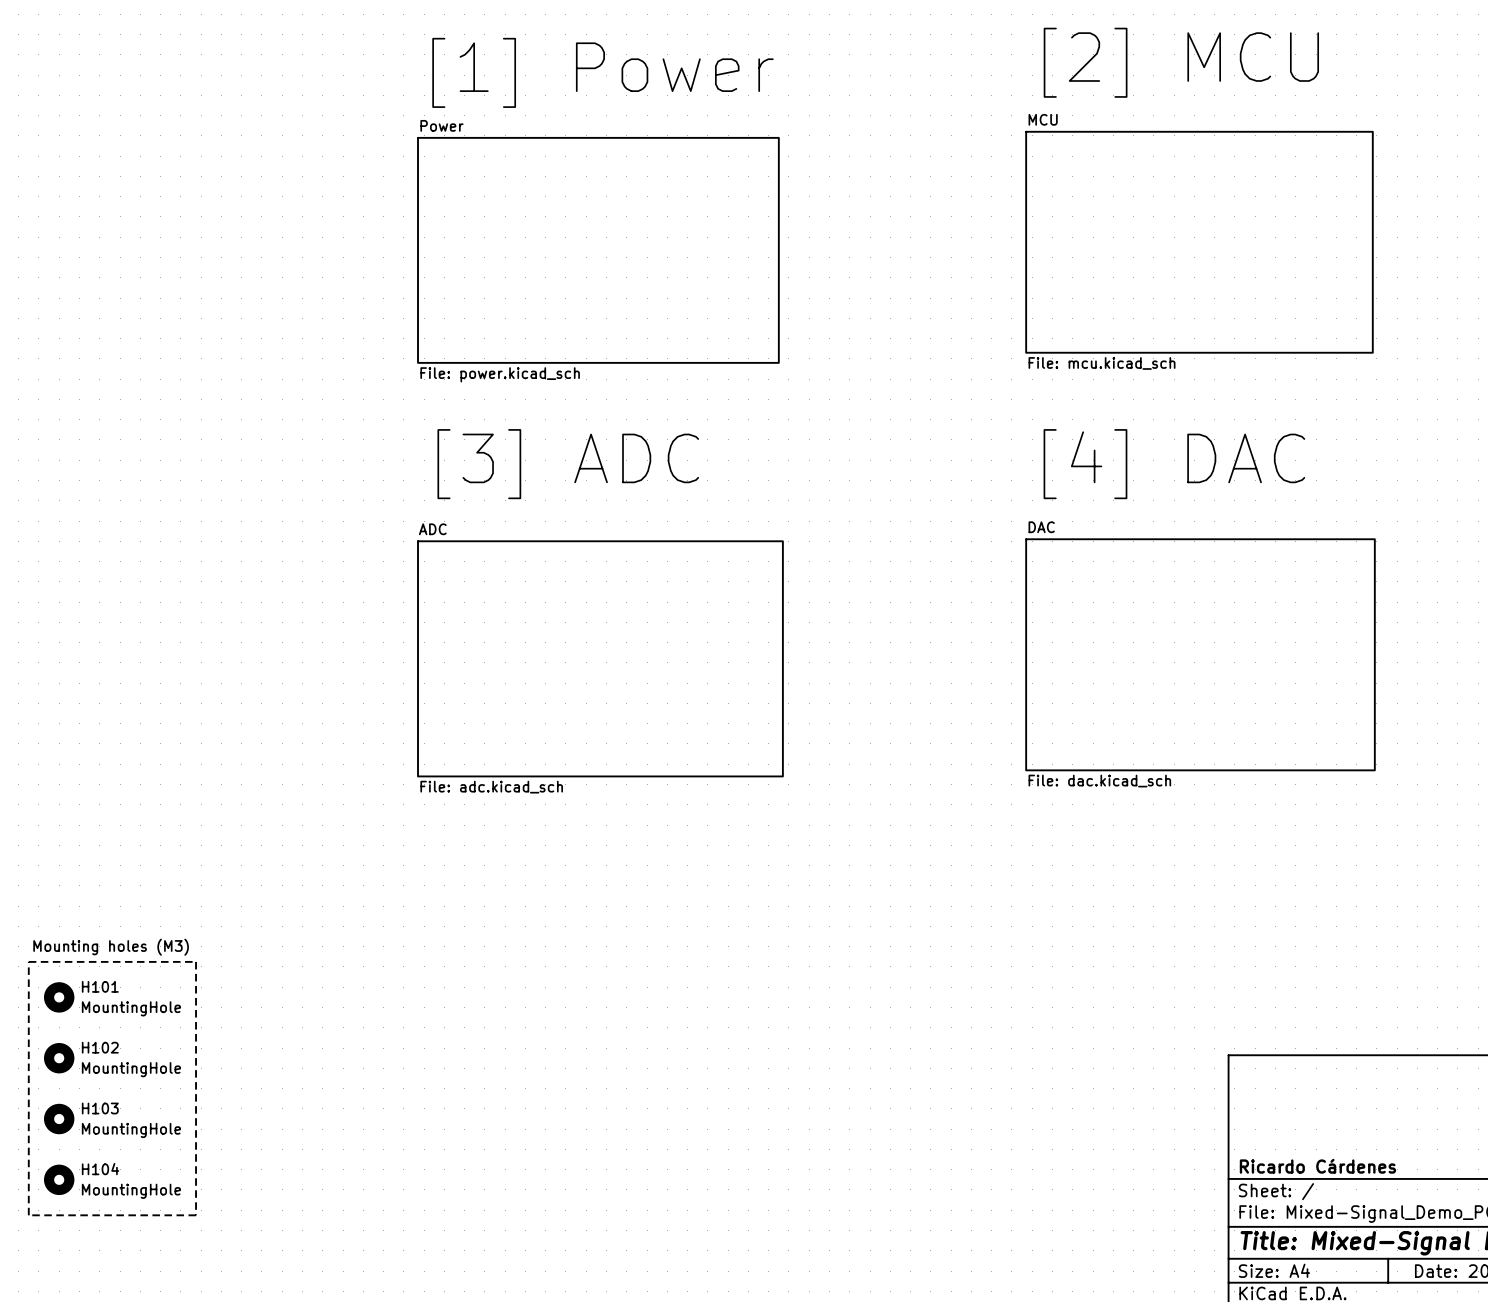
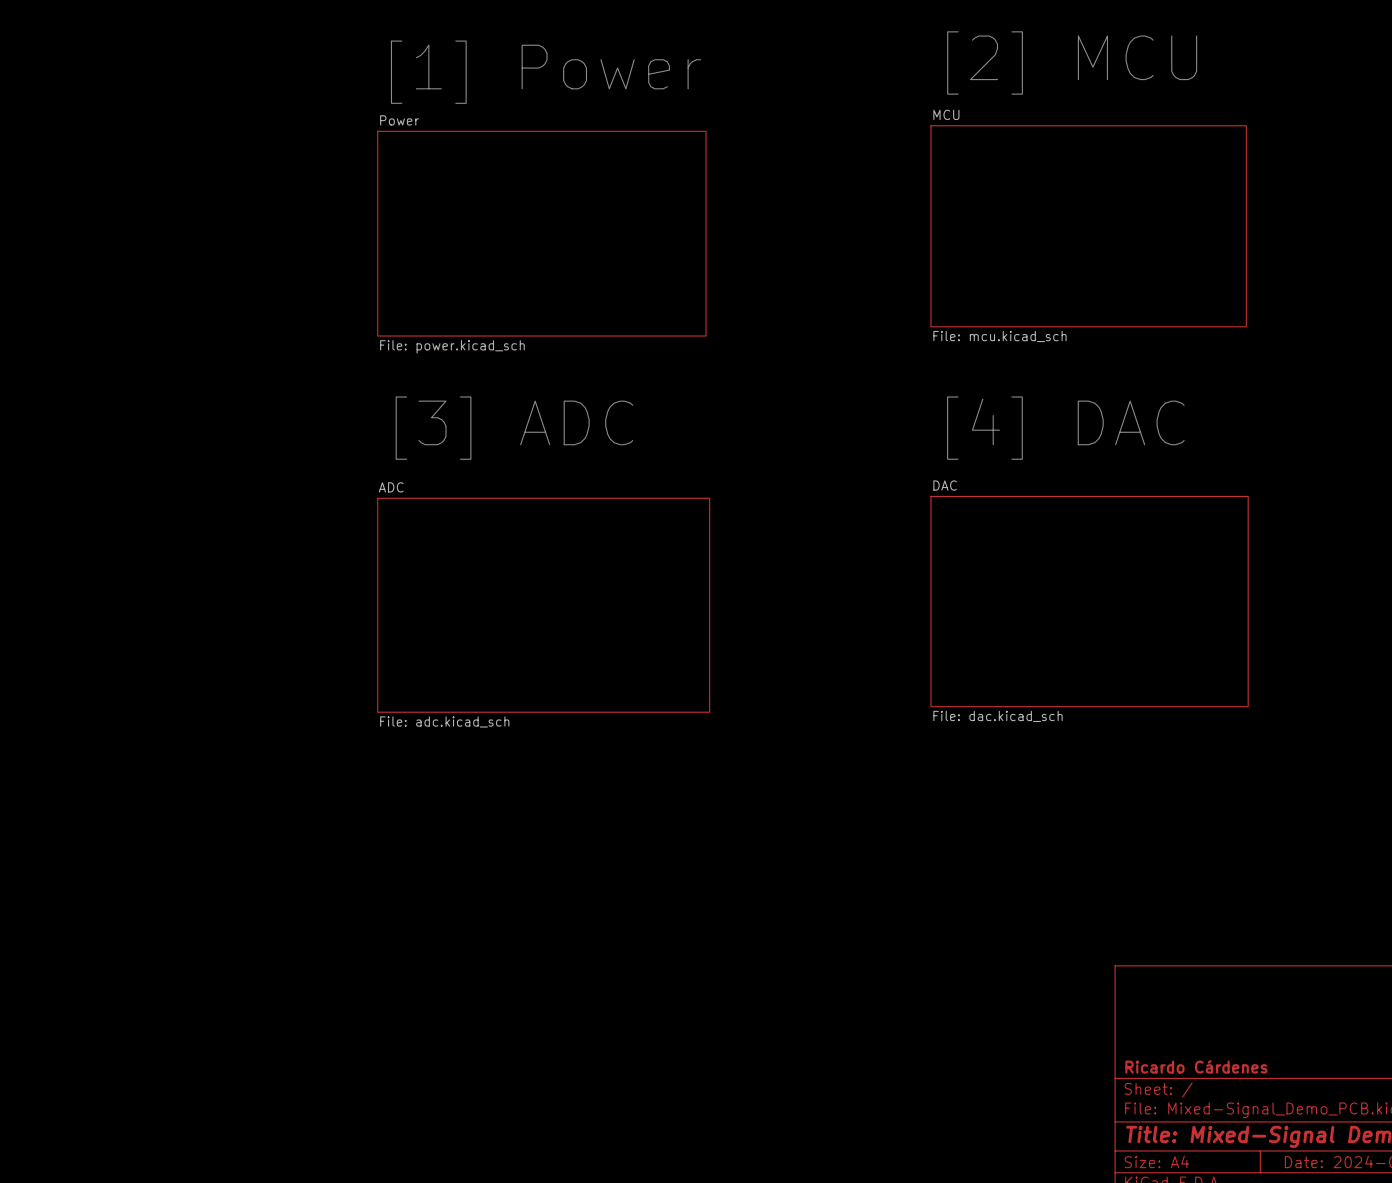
text: Mounting holes (M3) (111, 947) -> none
line: (28, 961) (196, 961) (196, 1215) (28, 1215) (28, 961) -> none
H101: MountingHole (59, 997) -> none
H102: MountingHole (59, 1058) -> none
H103: MountingHole (59, 1119) -> none
H104: MountingHole (59, 1179) -> none

